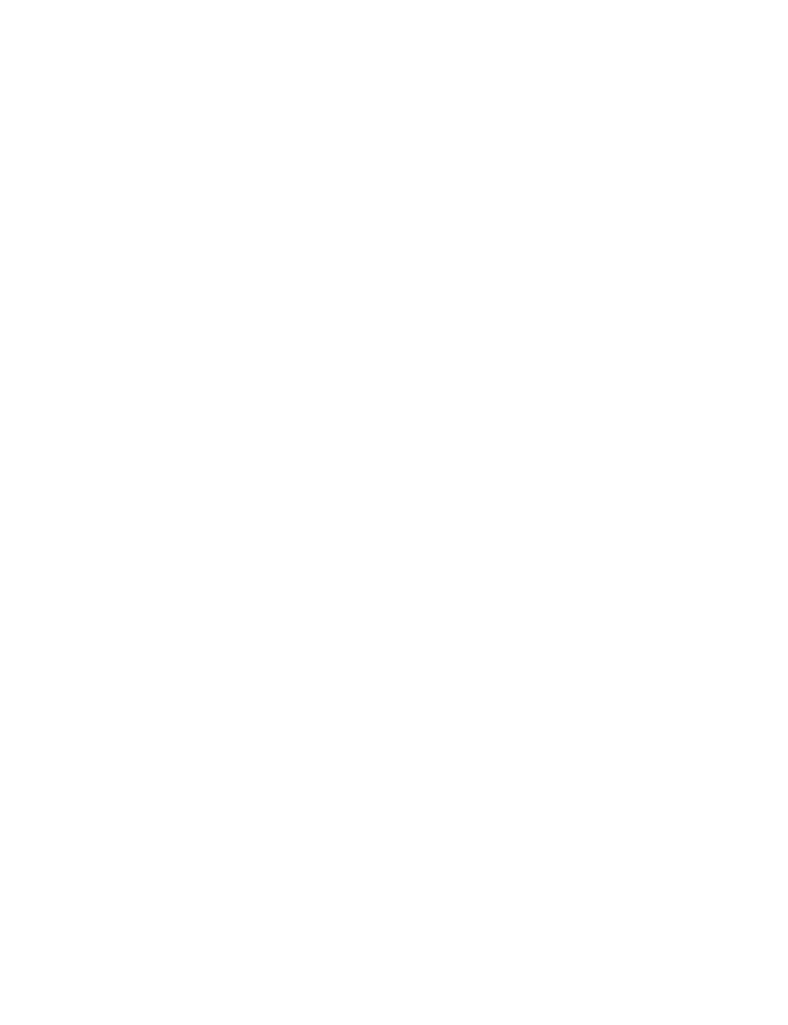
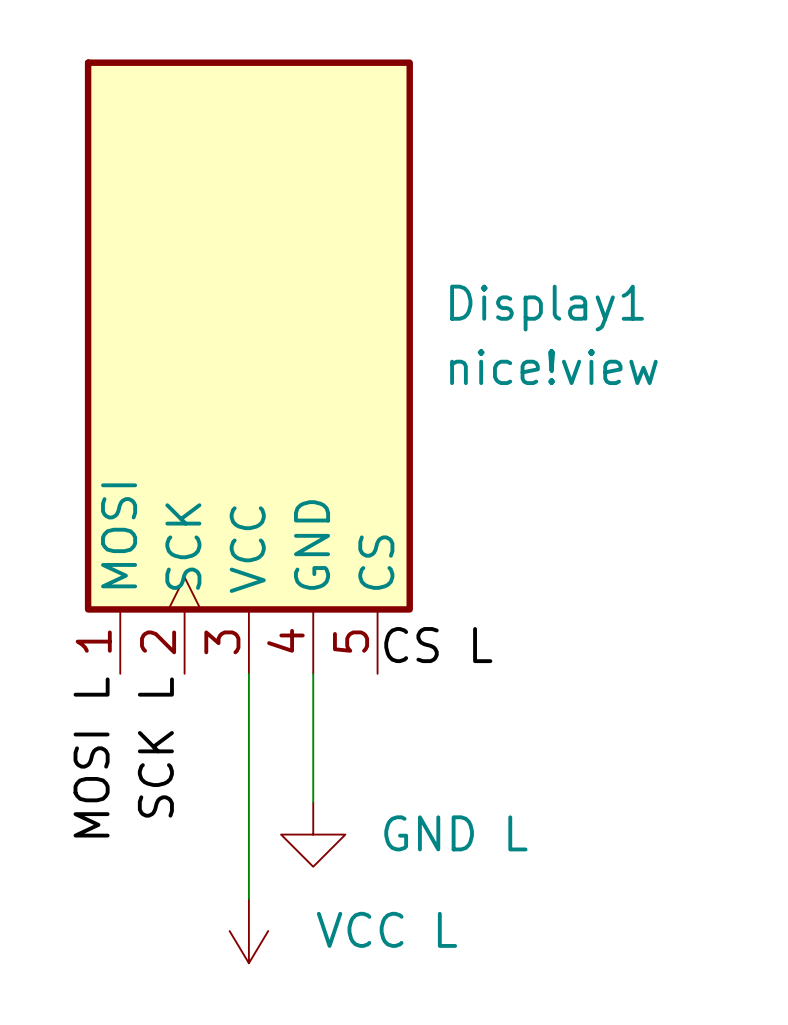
Display1: none -> nice!view (248, 366)
label: none -> CS L (438, 645)
wire: none -> (248, 673) (248, 898)
wire: none -> (313, 673) (313, 802)
label: none -> SCK L (155, 747)
label: none -> MOSI L (91, 757)
power symbol: none -> GND L (313, 834)
power symbol: none -> VCC L (248, 931)

